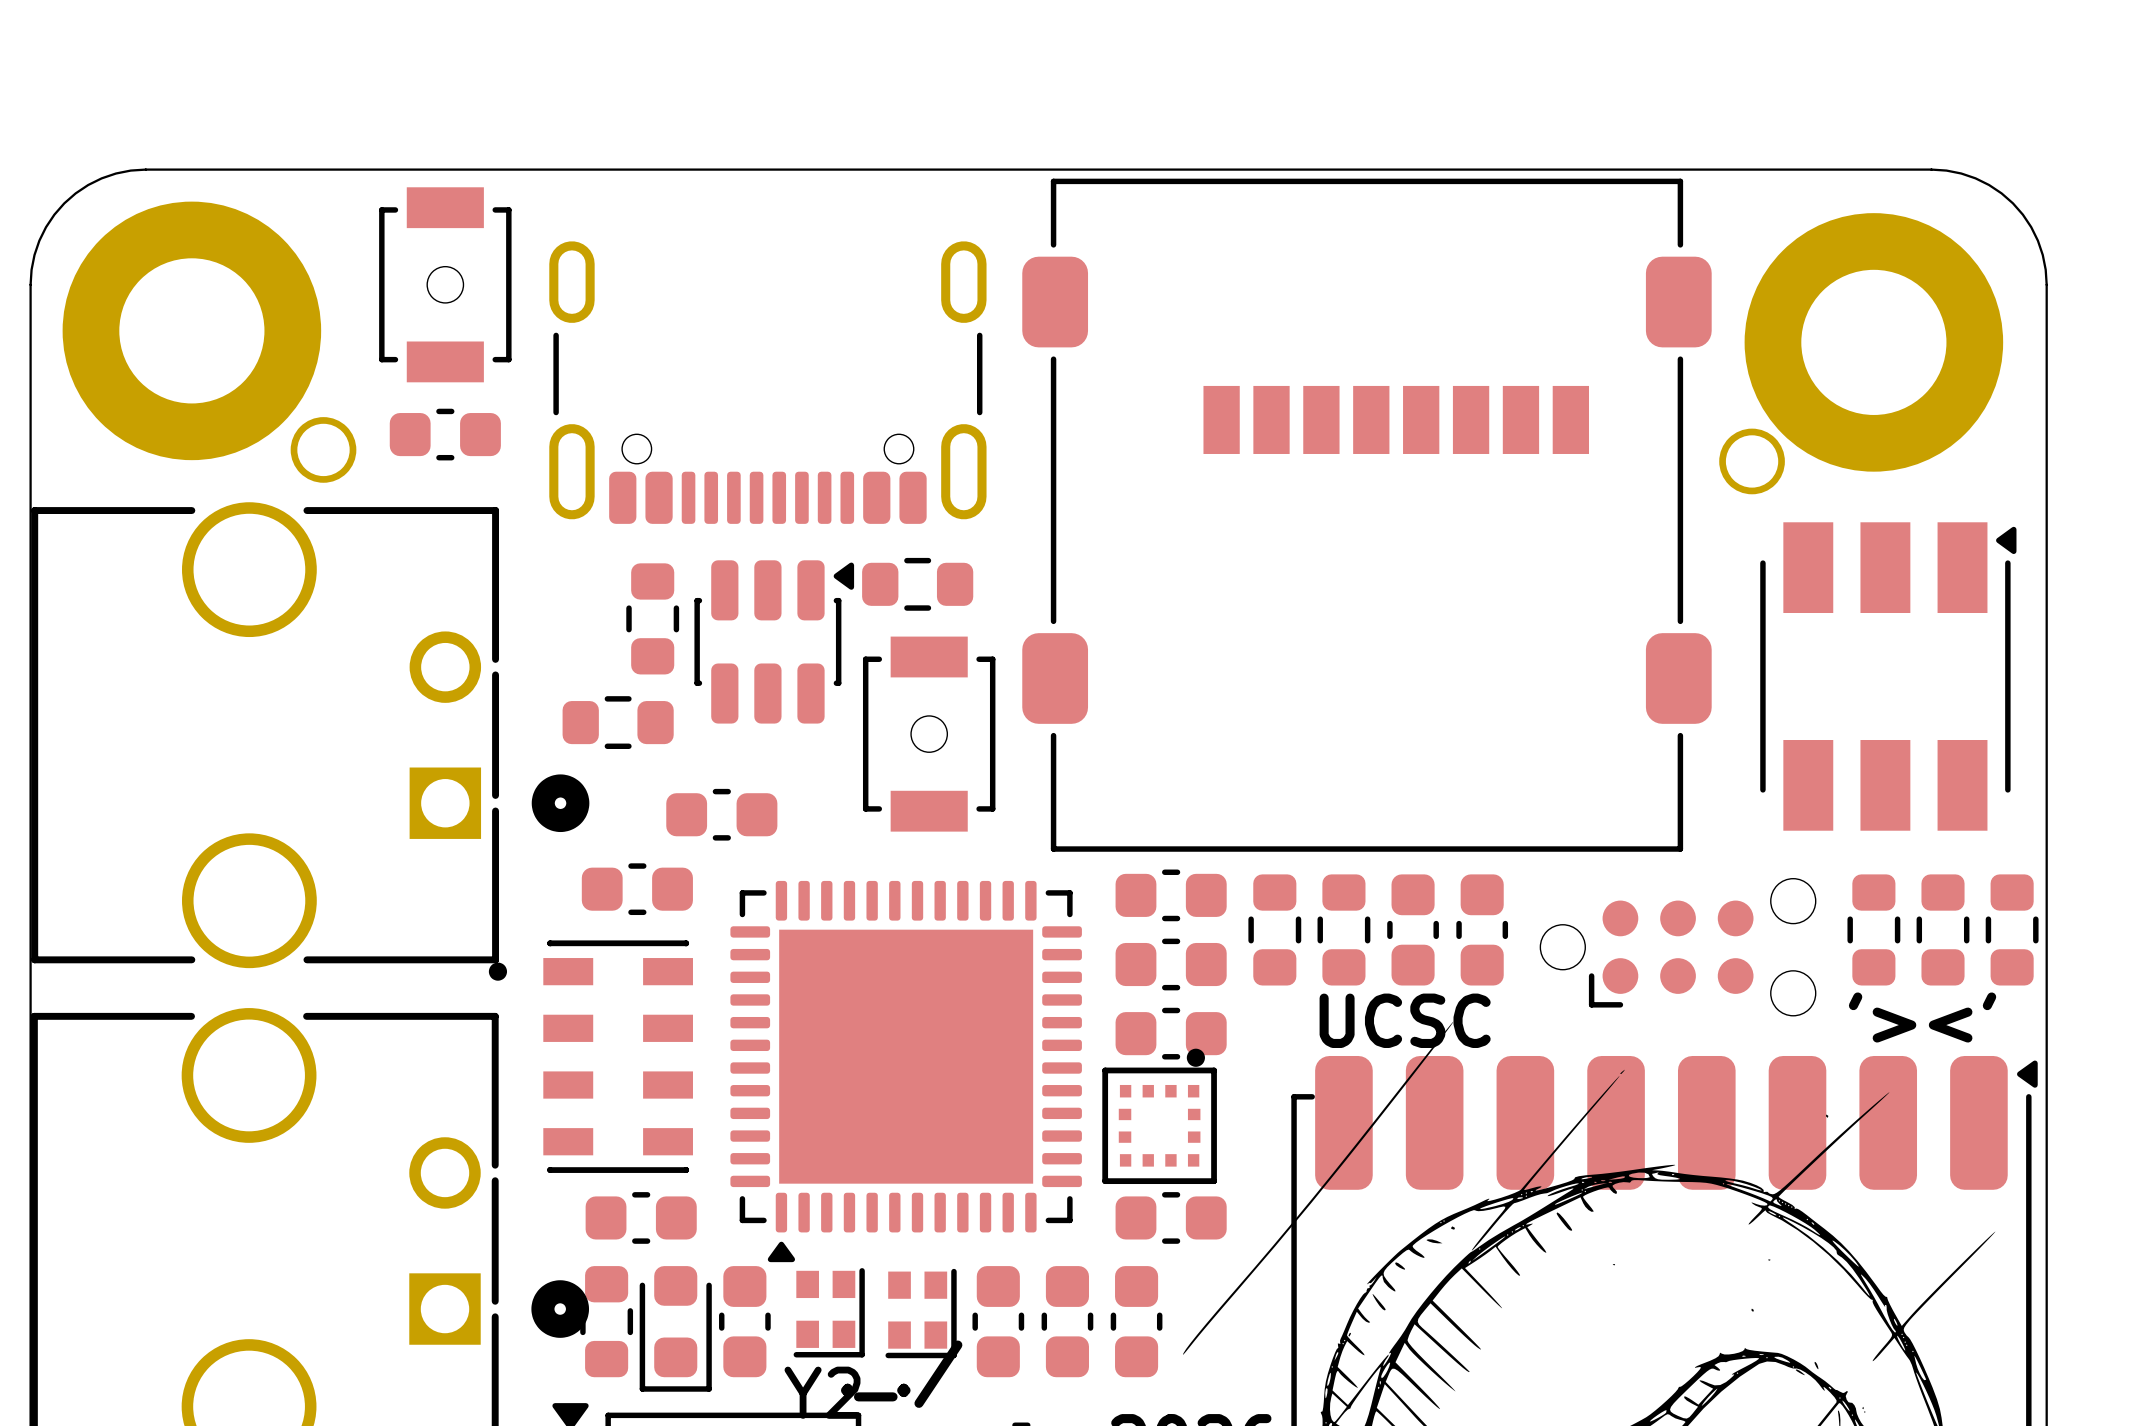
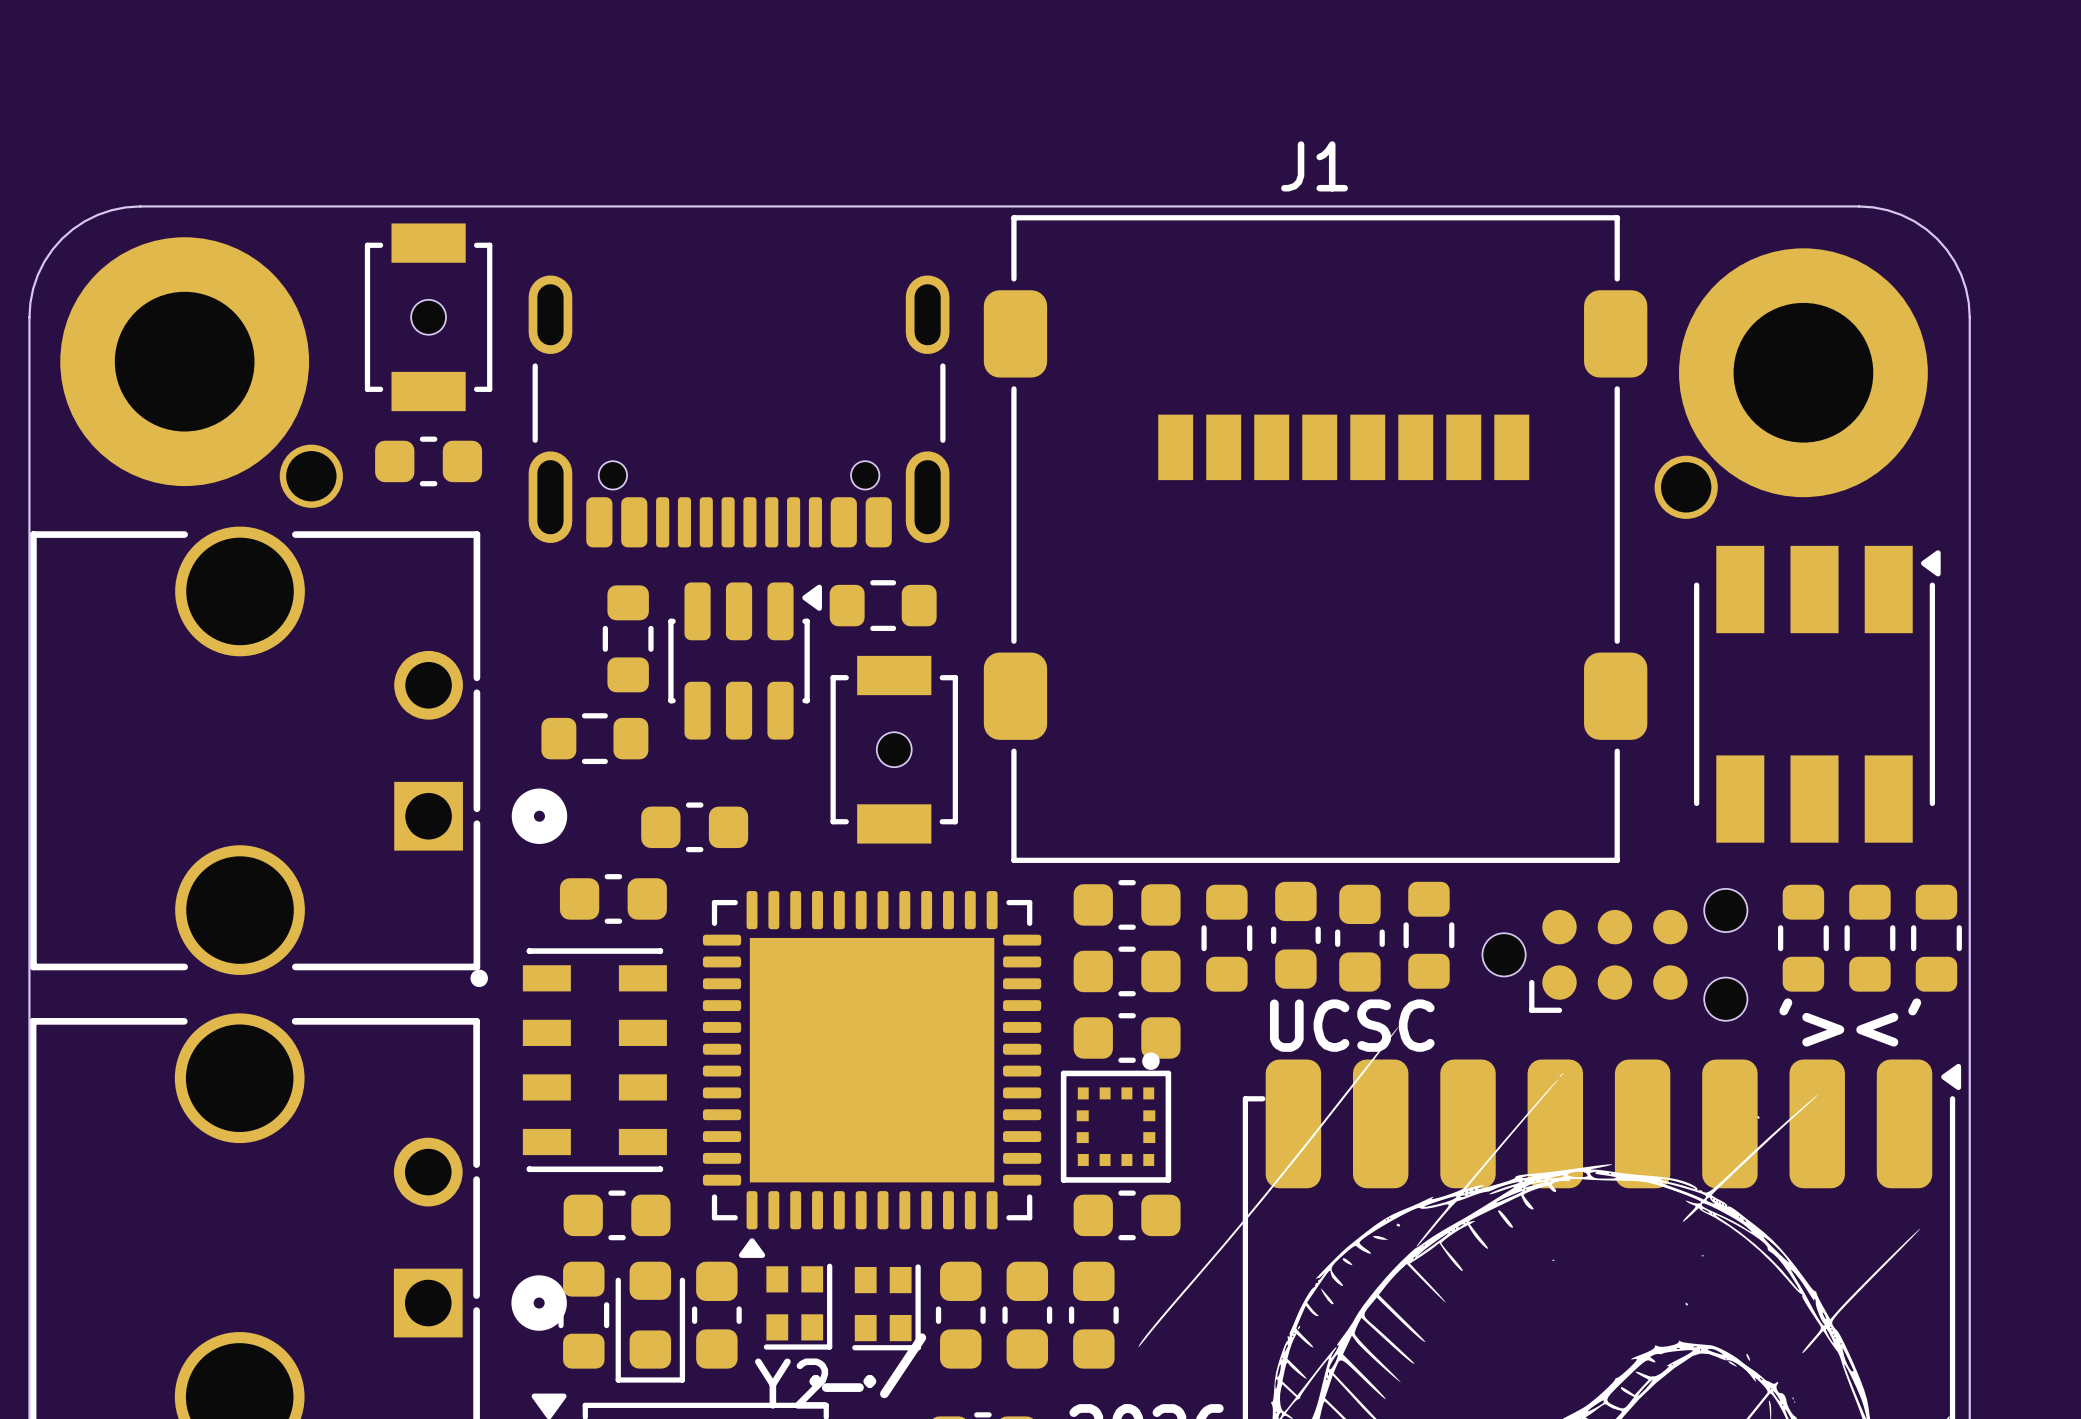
J1 name: none -> J1 (1314, 166)
part footprint: [1317, 874, 1371, 986] -> [1271, 881, 1321, 989]
part footprint: [1456, 874, 1509, 986] -> [1403, 881, 1455, 989]

